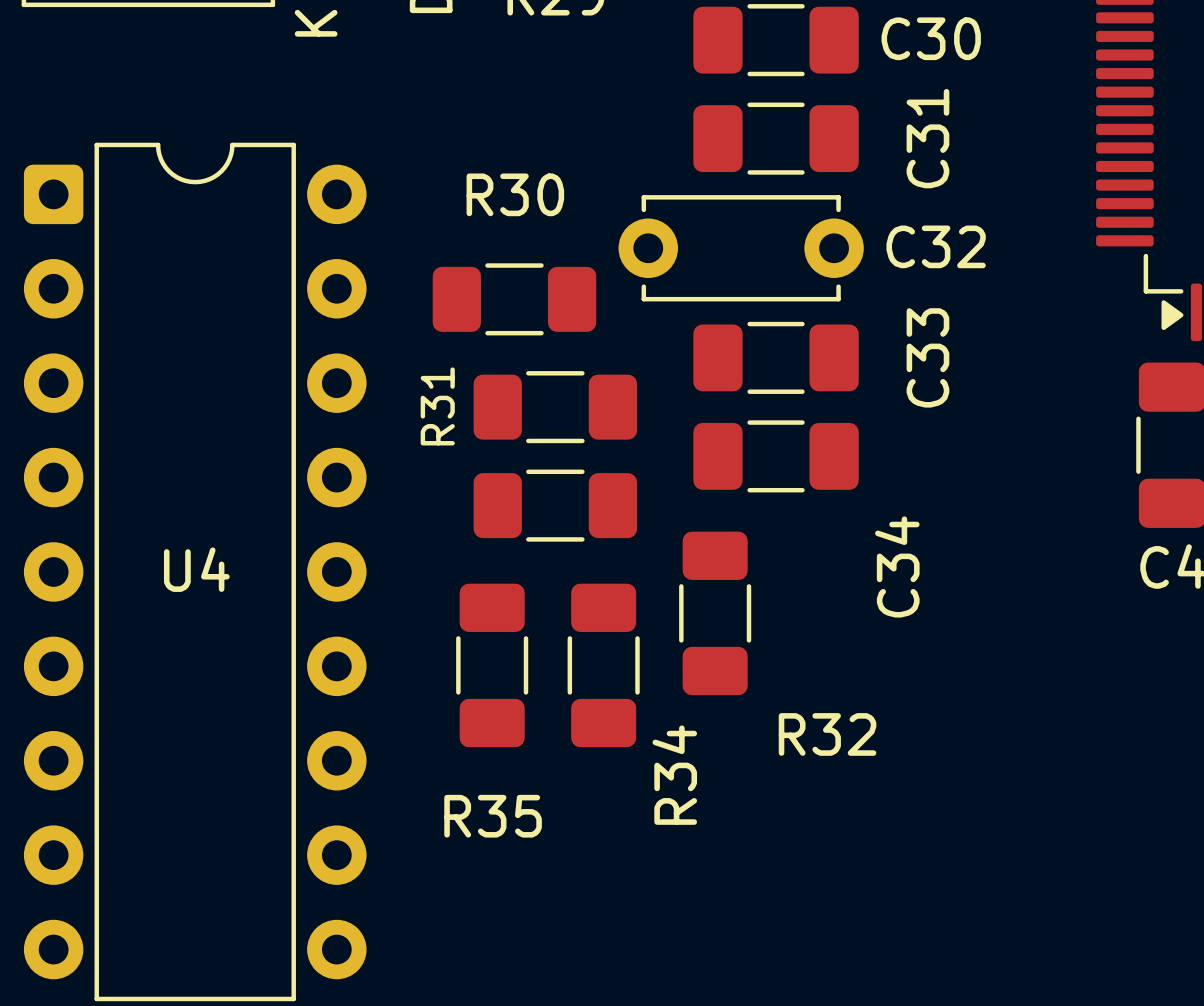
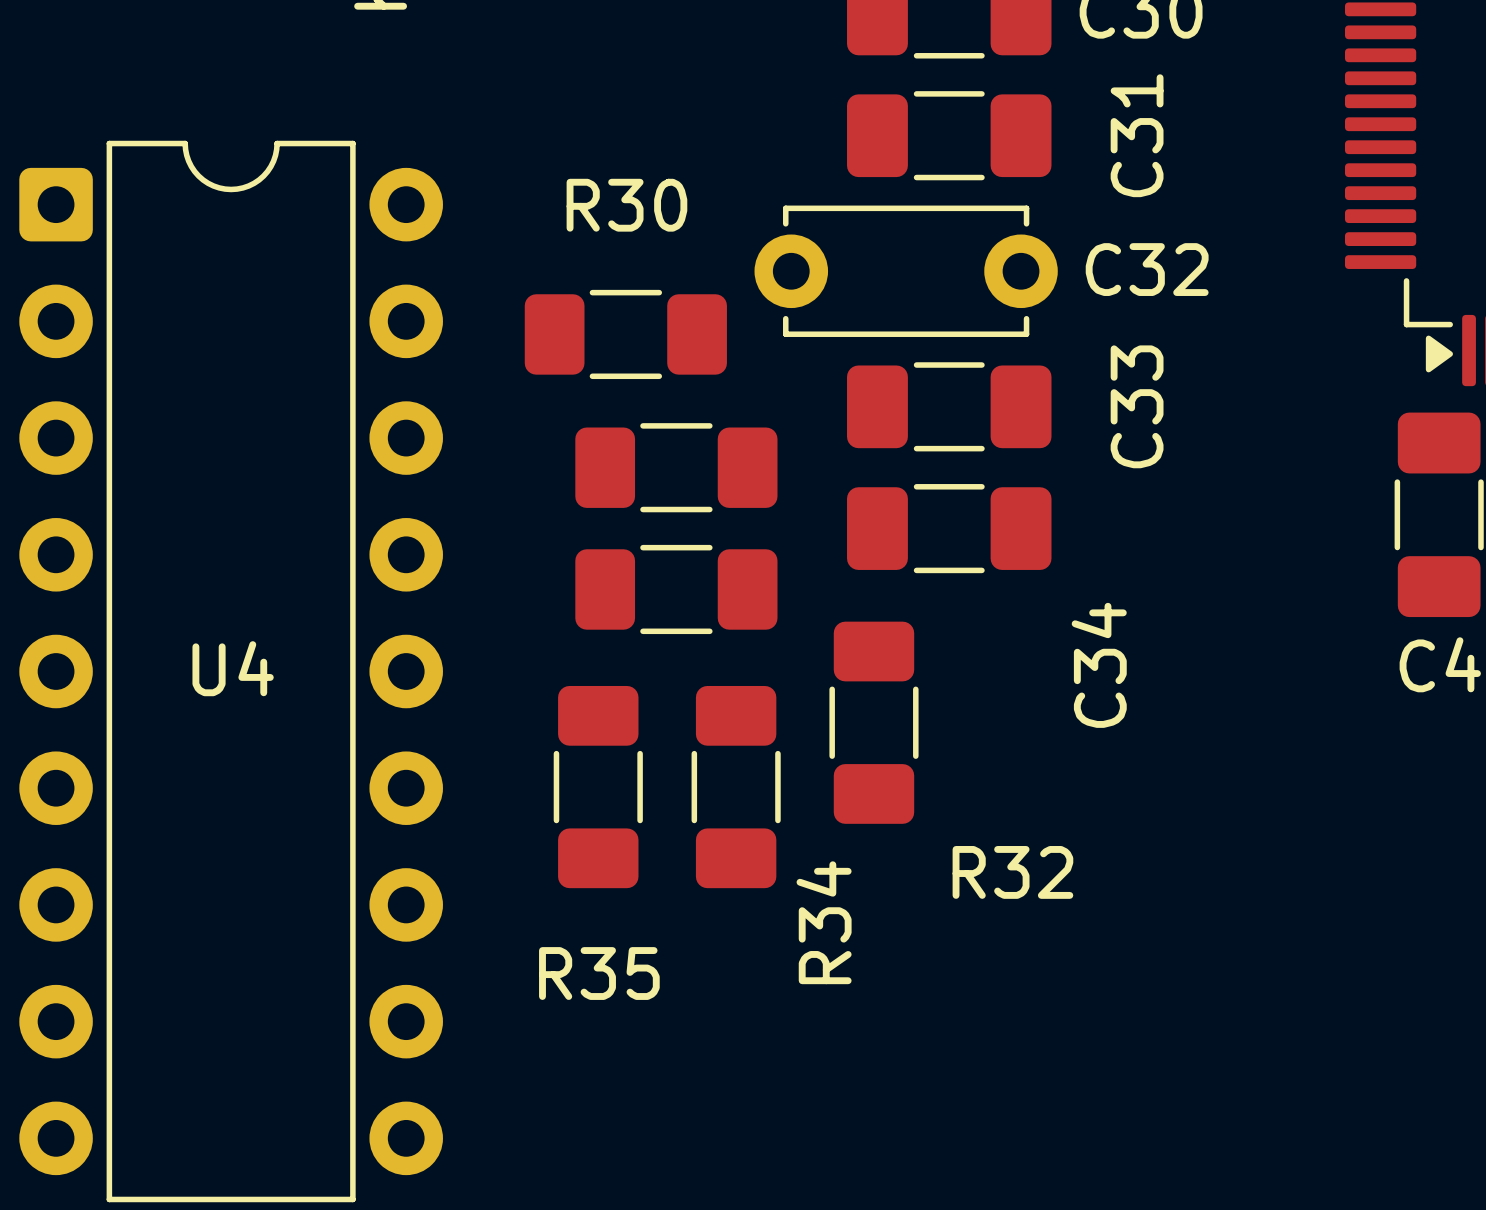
R31 name: R31 (437, 406) -> none

